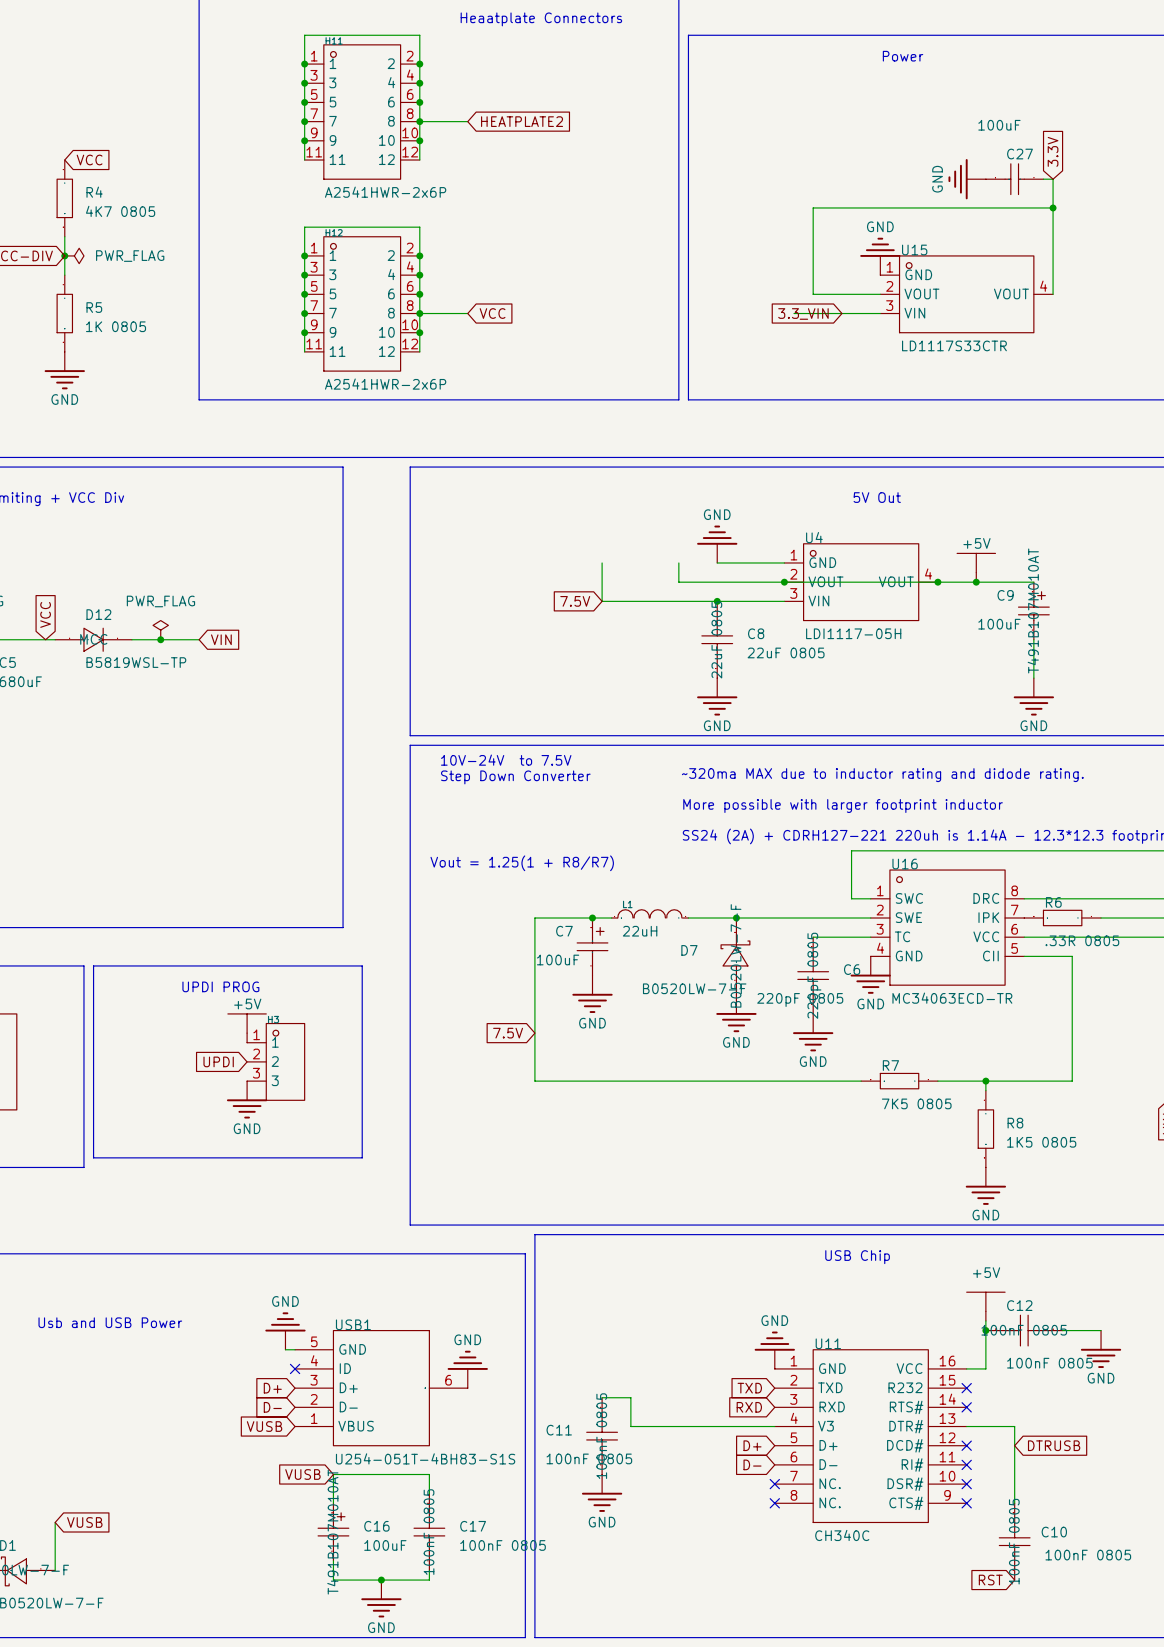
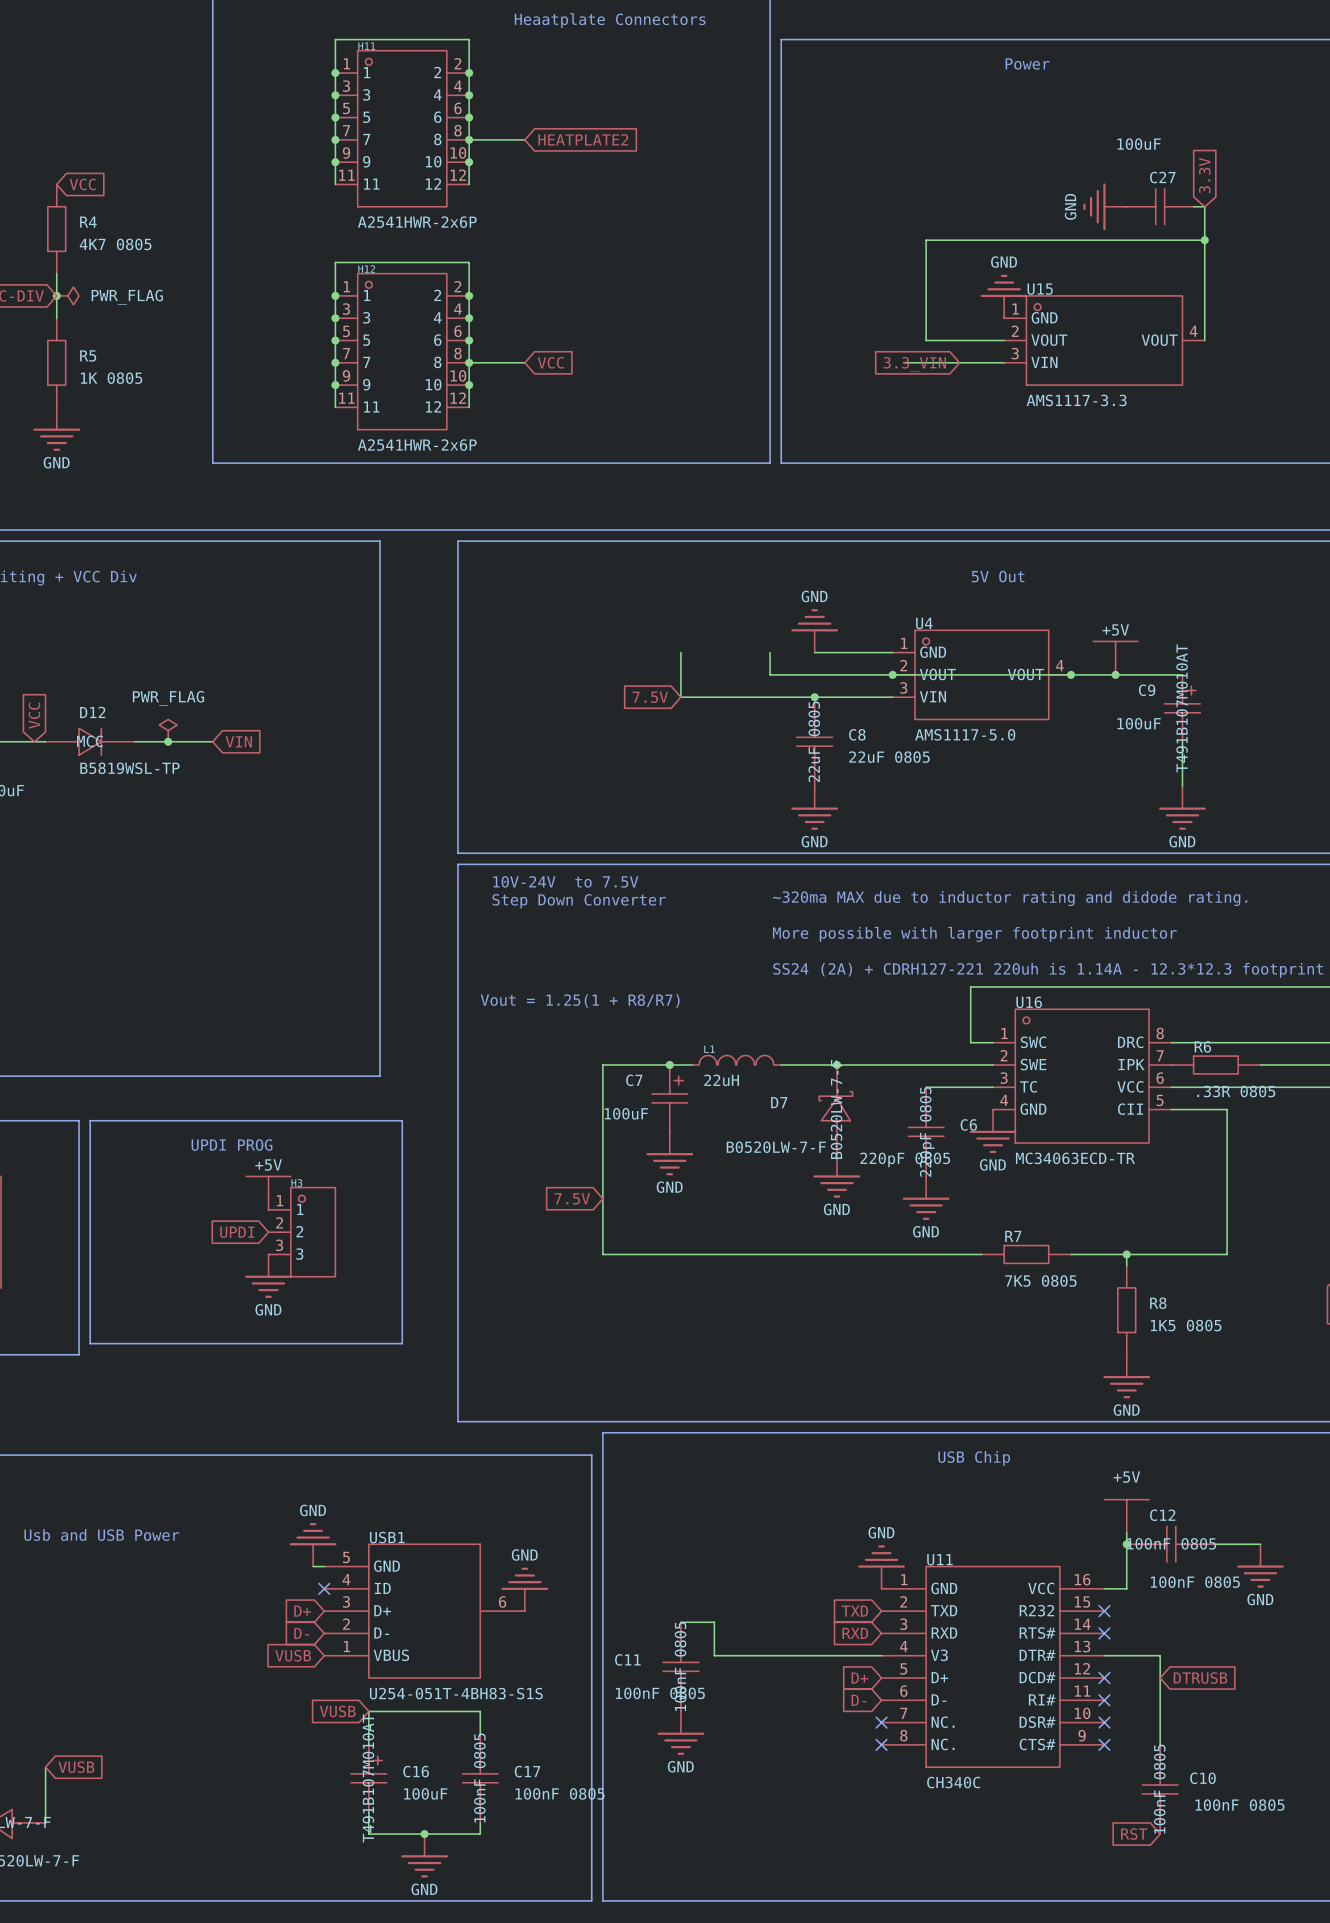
U15 value: LD1117S33CTR (954, 345) -> AMS1117-3.3 (1076, 400)
U4 value: LDI1117-05H (853, 633) -> AMS1117-5.0 (965, 734)

